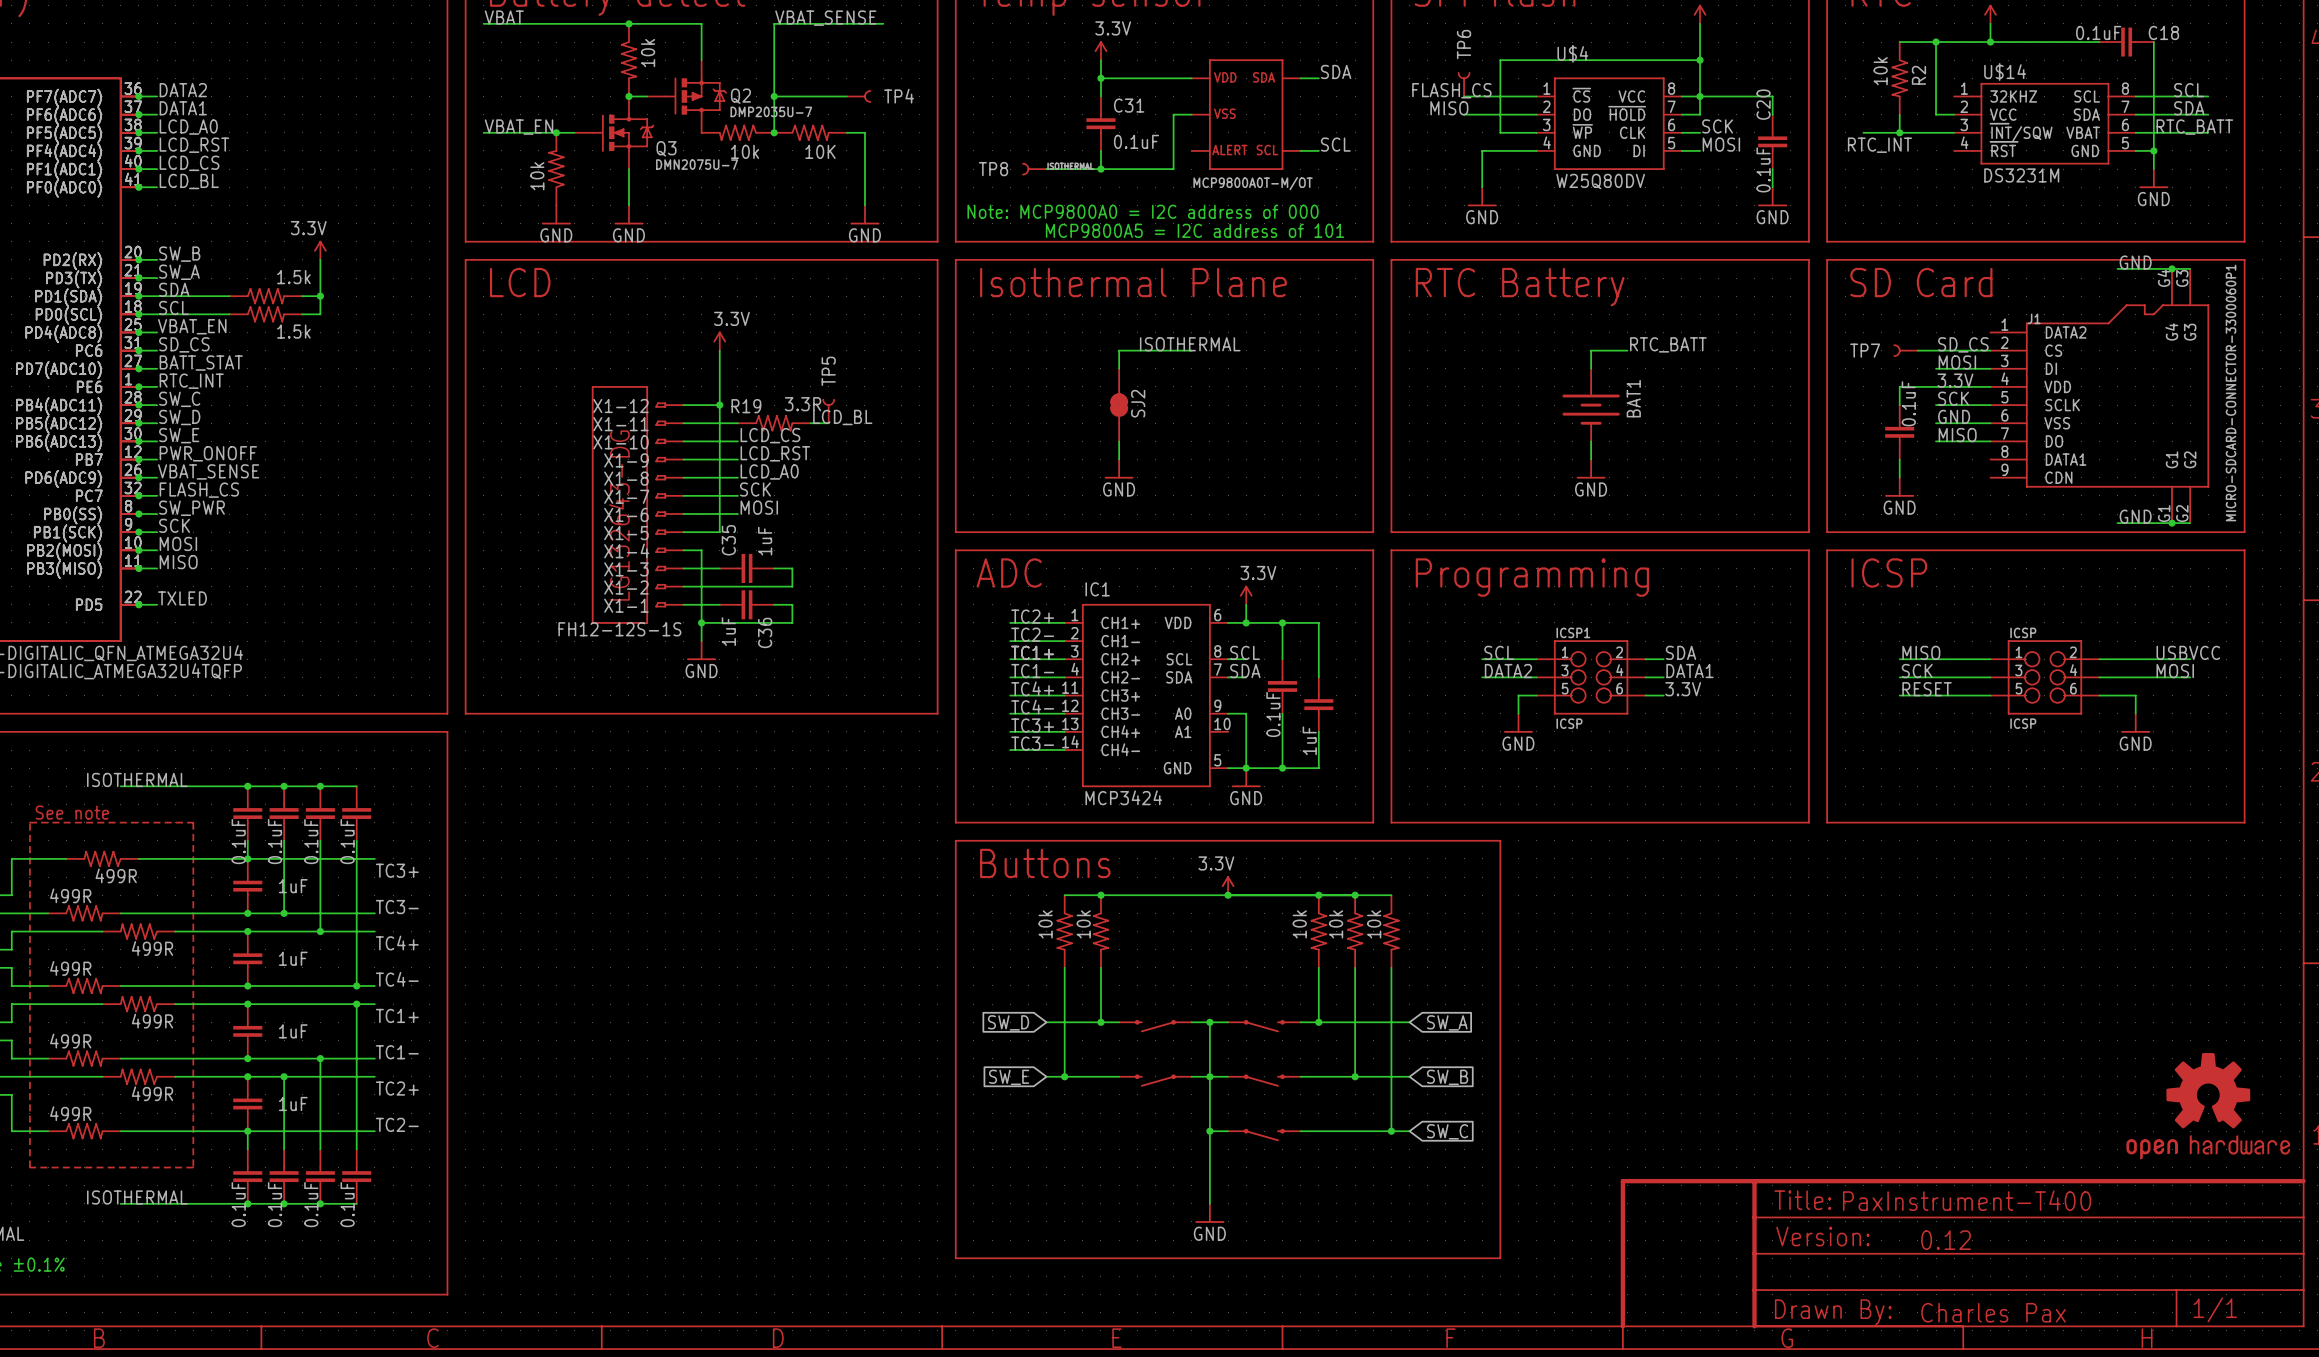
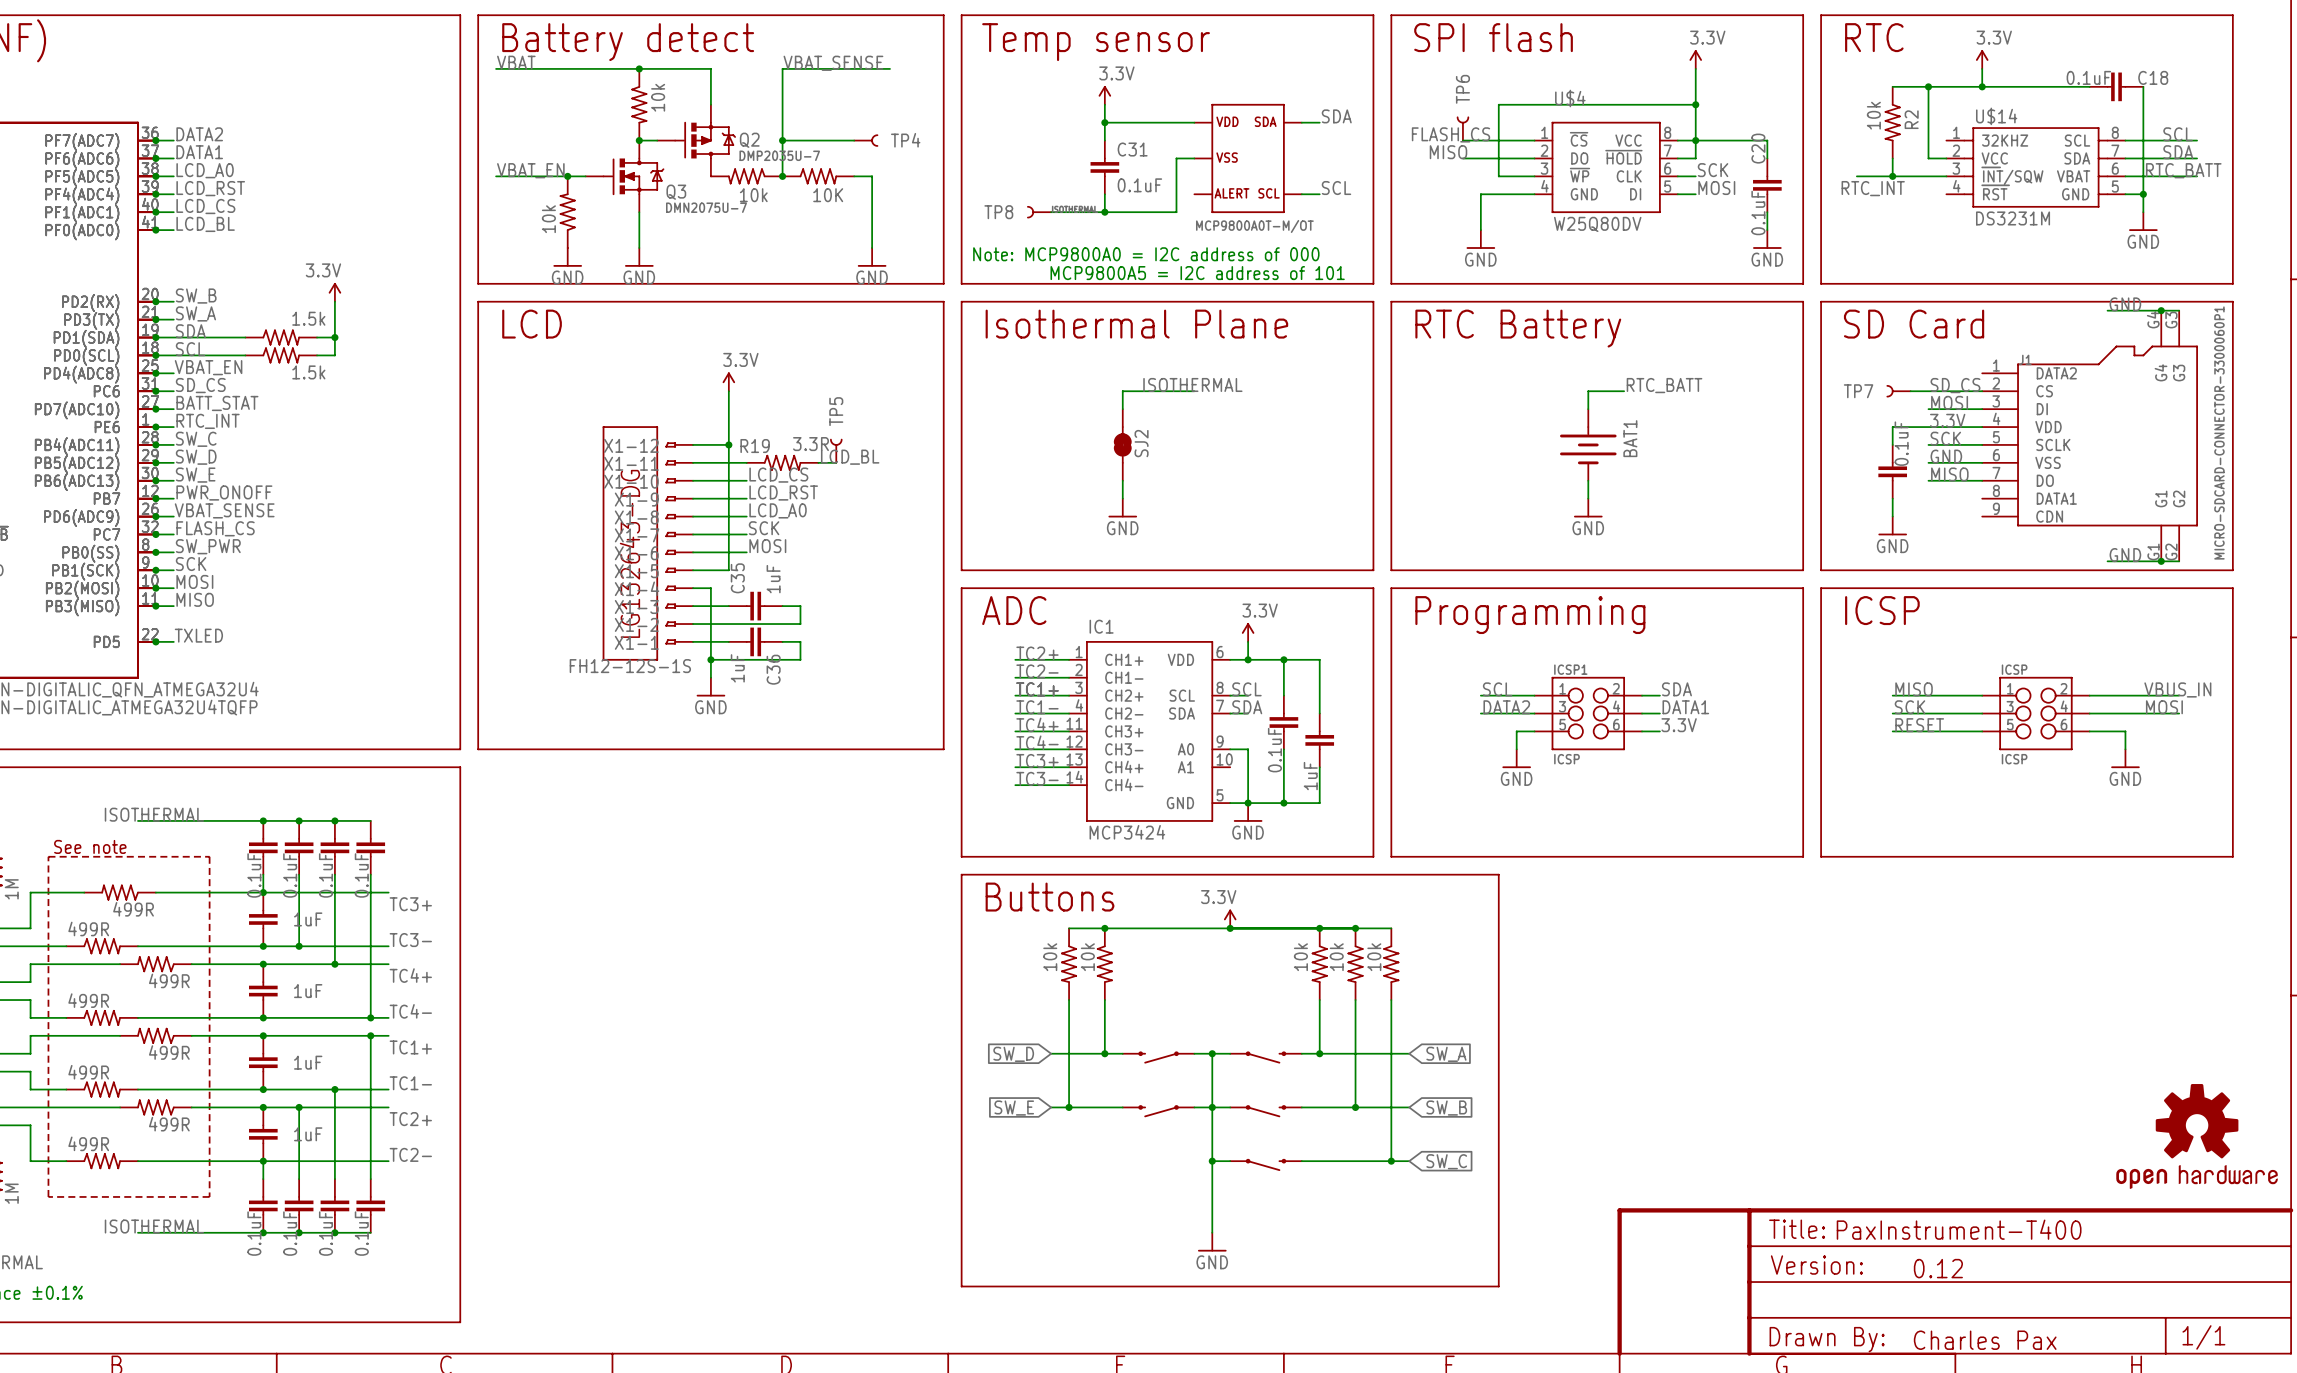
label: USBVCC (2188, 652) -> VBUS_IN (2177, 689)

